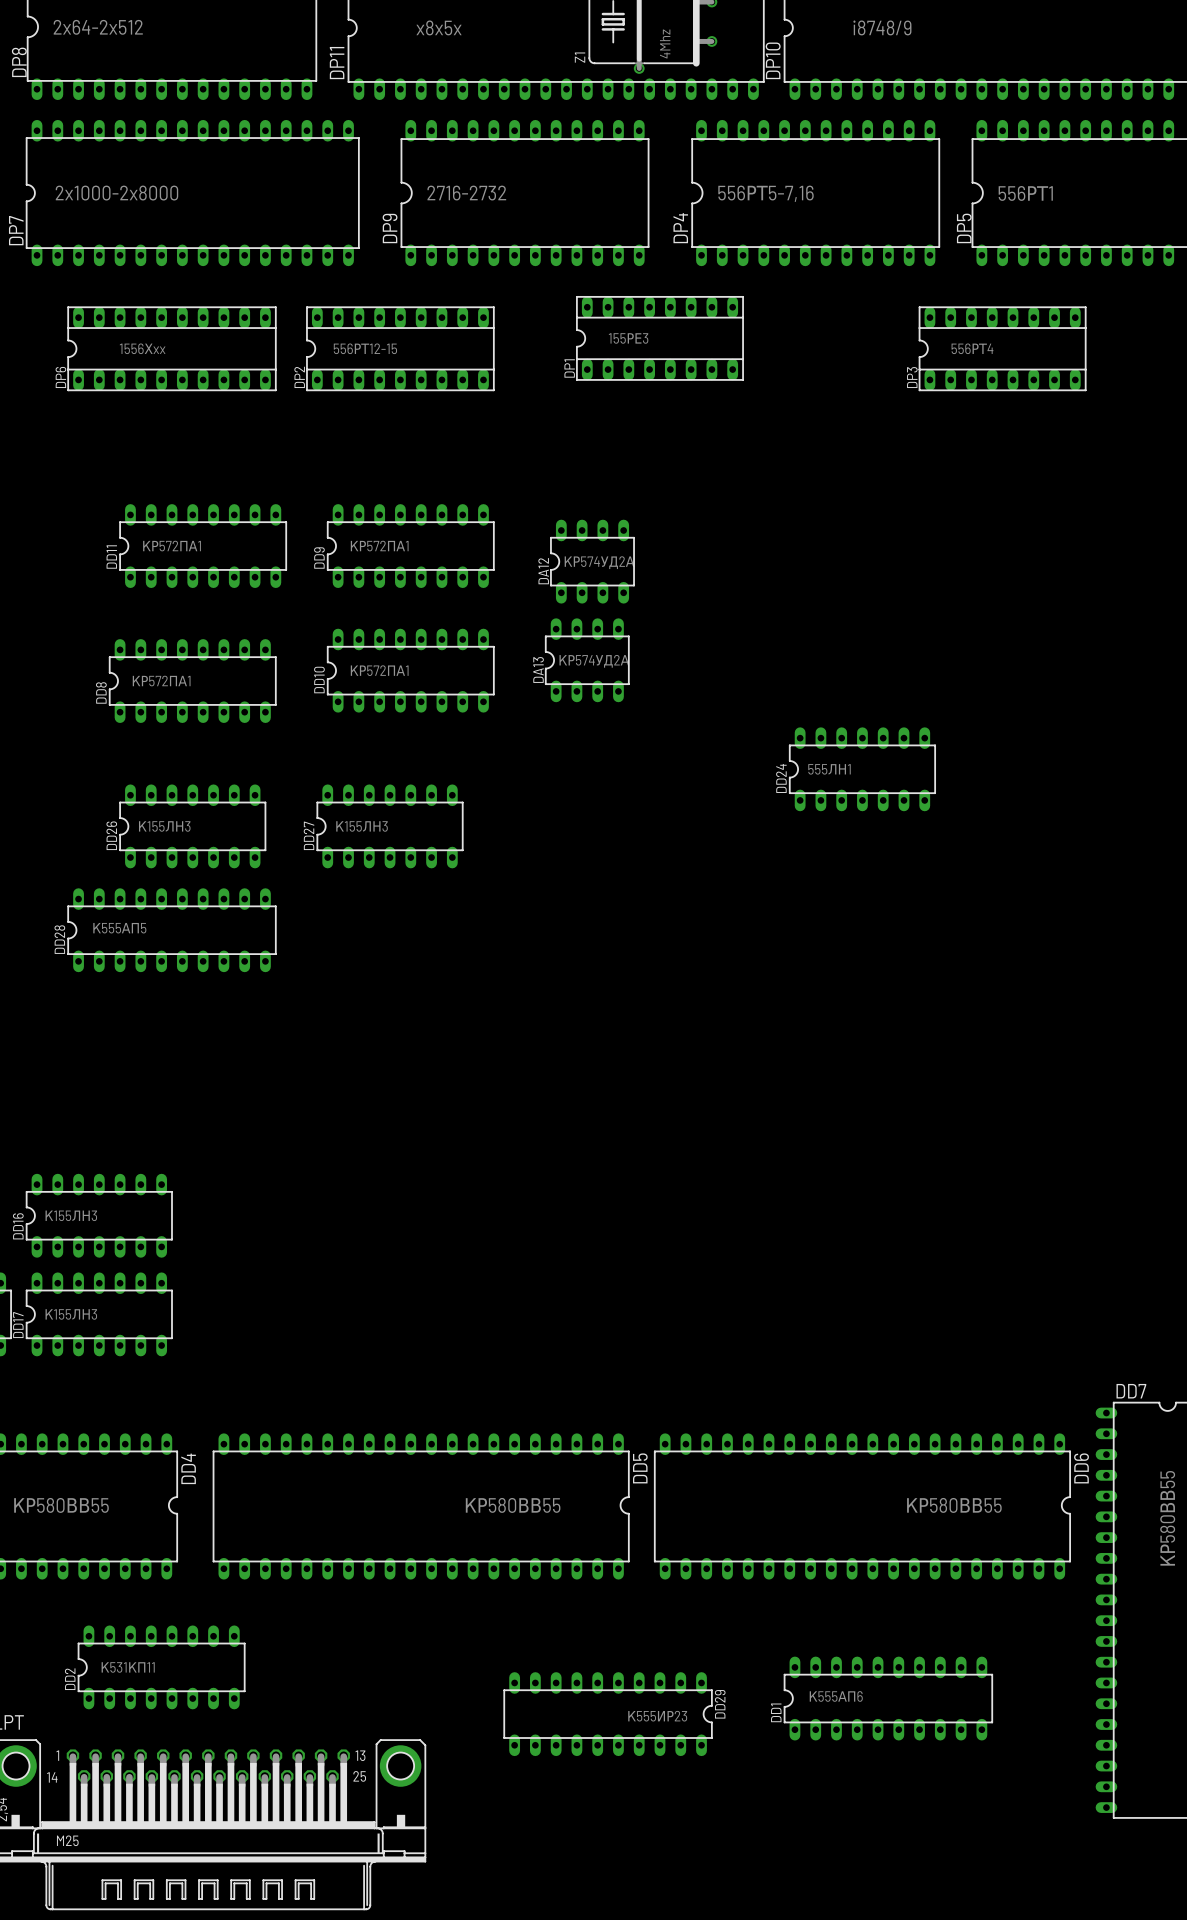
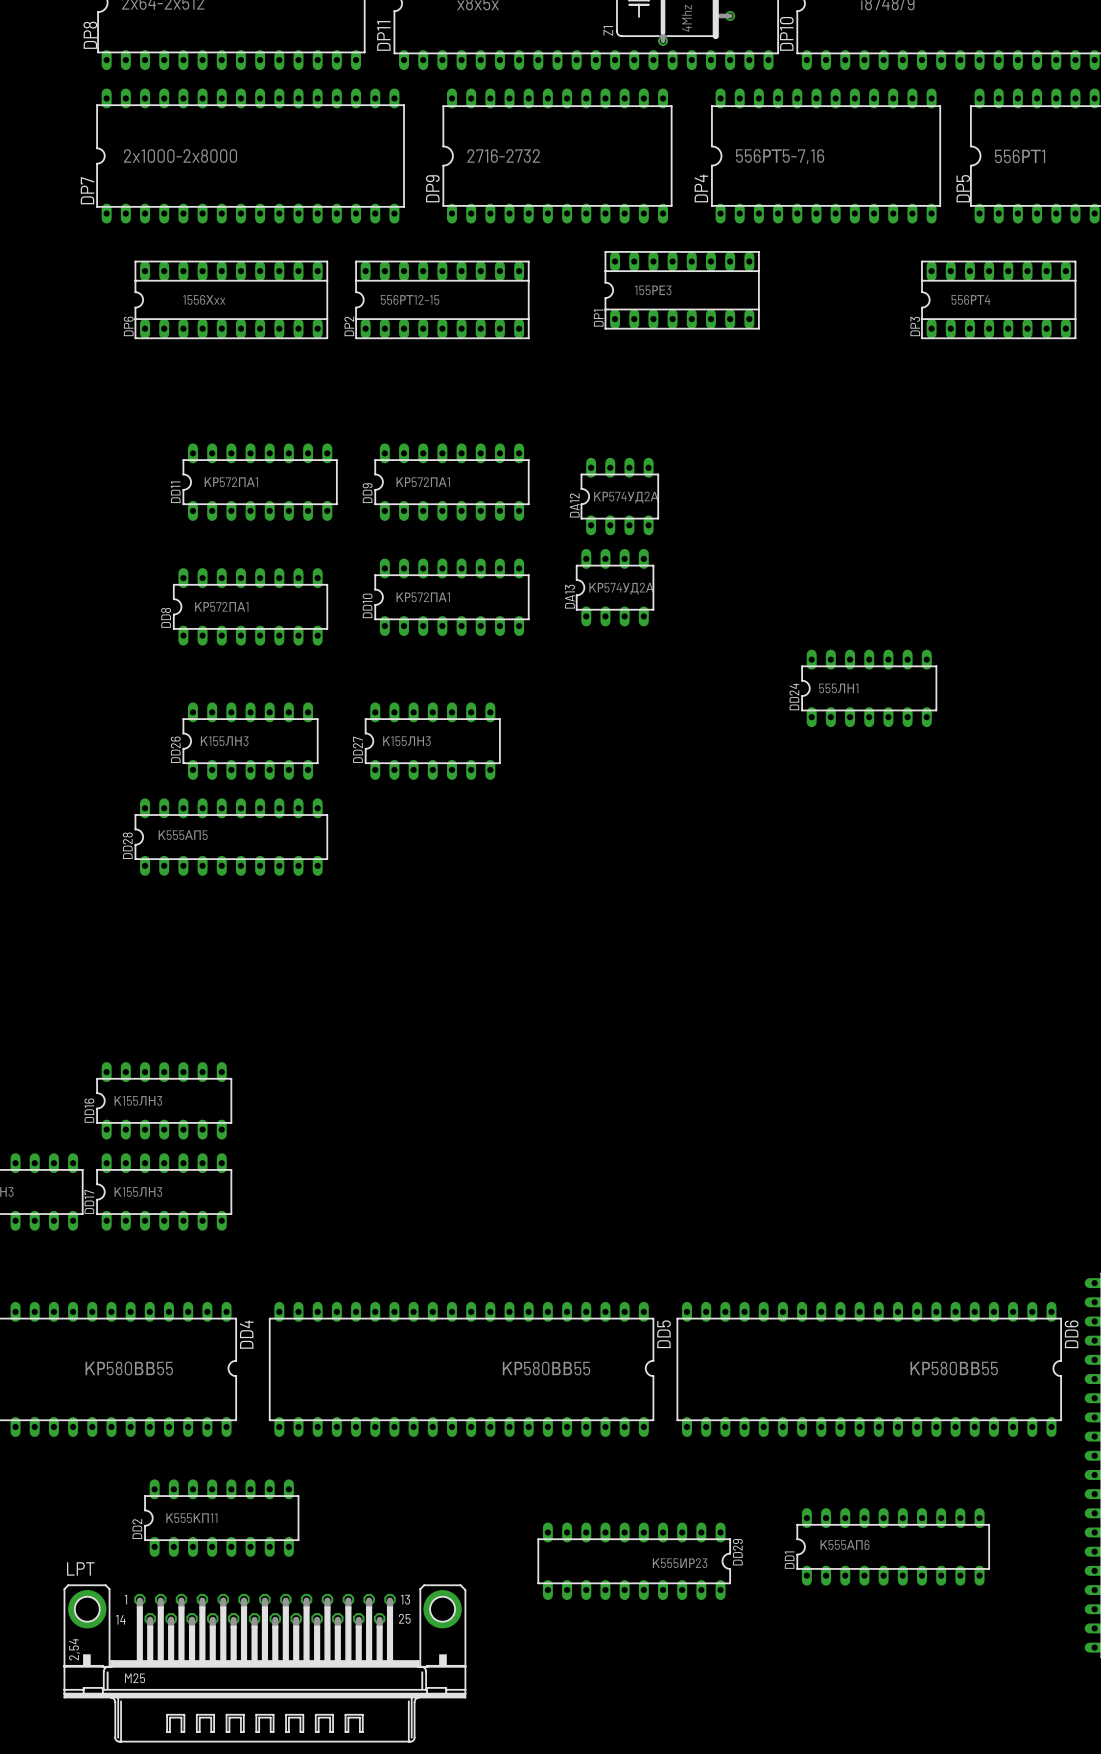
DD2 value: К531КП11 (128, 1667) -> К555КП11 (191, 1518)

